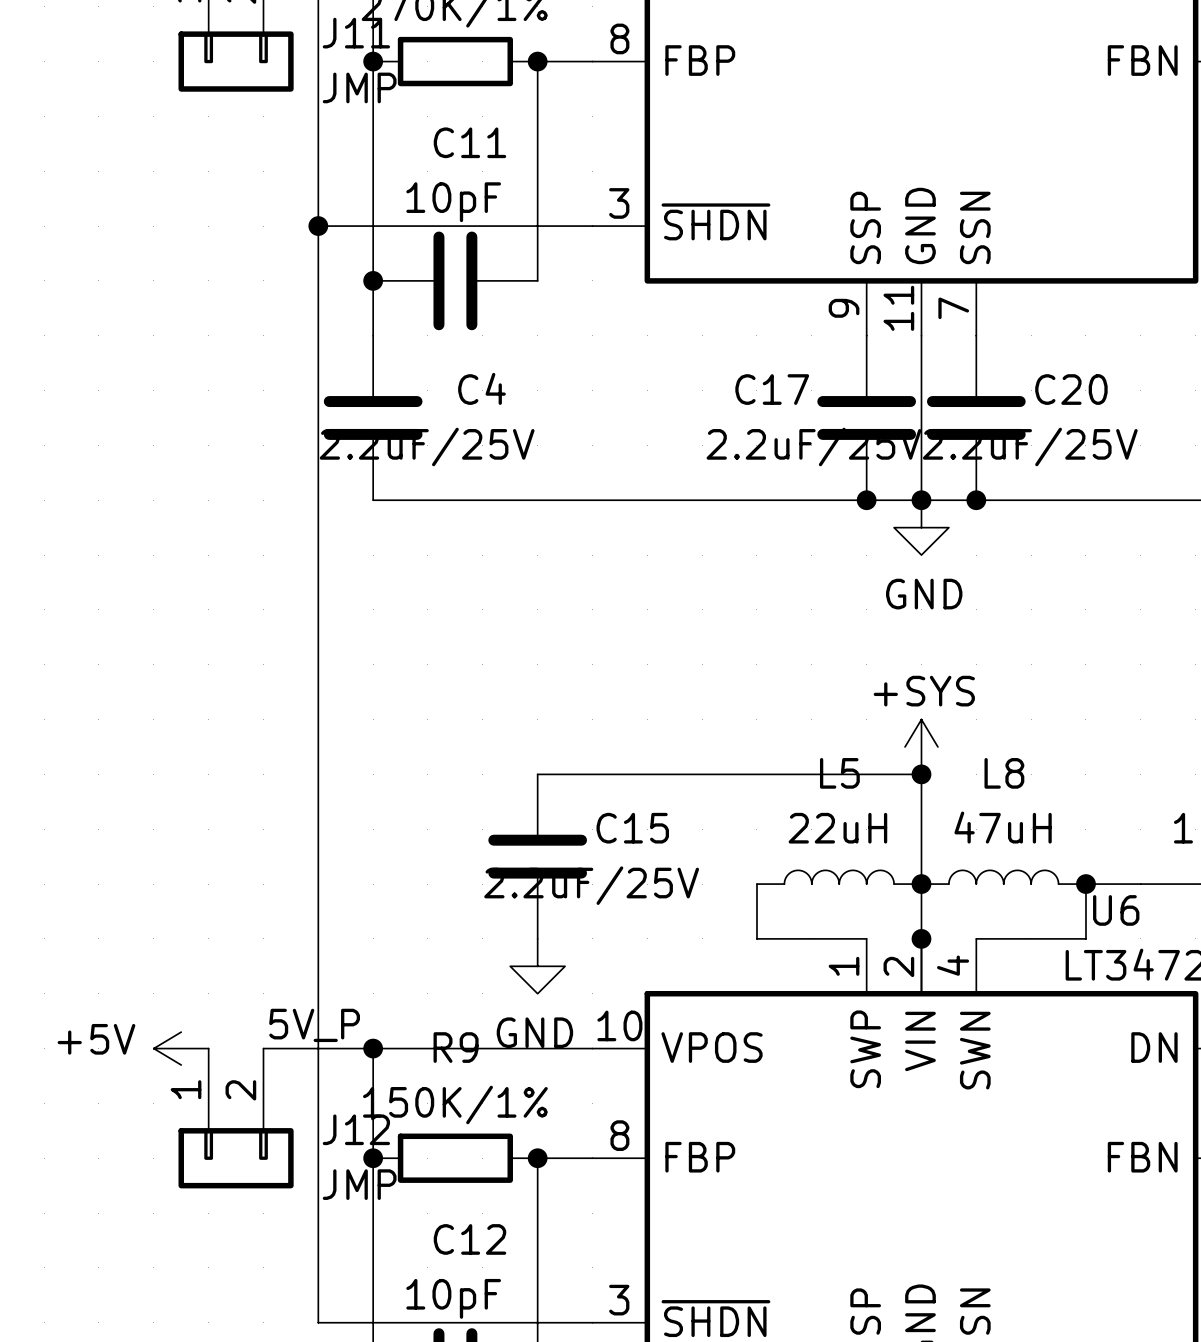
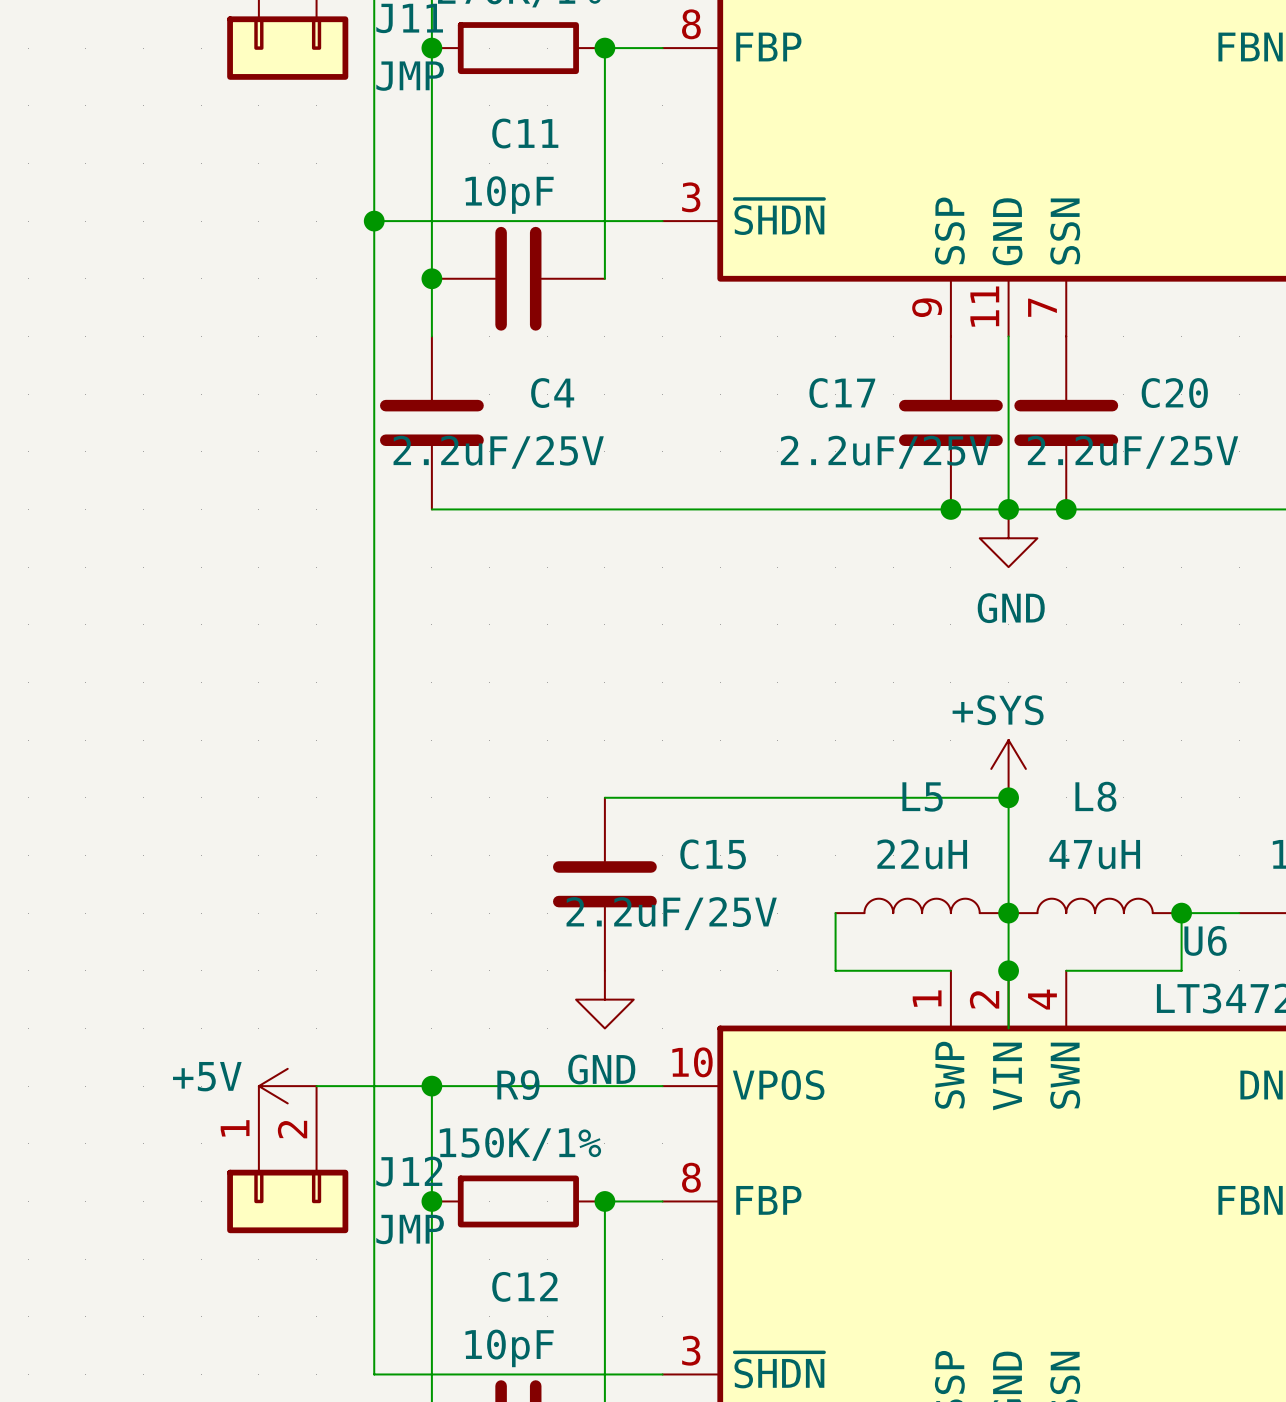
label: 5V_P (314, 1025) -> none
power symbol position: +5V (181, 1048) -> +5V (287, 1086)

